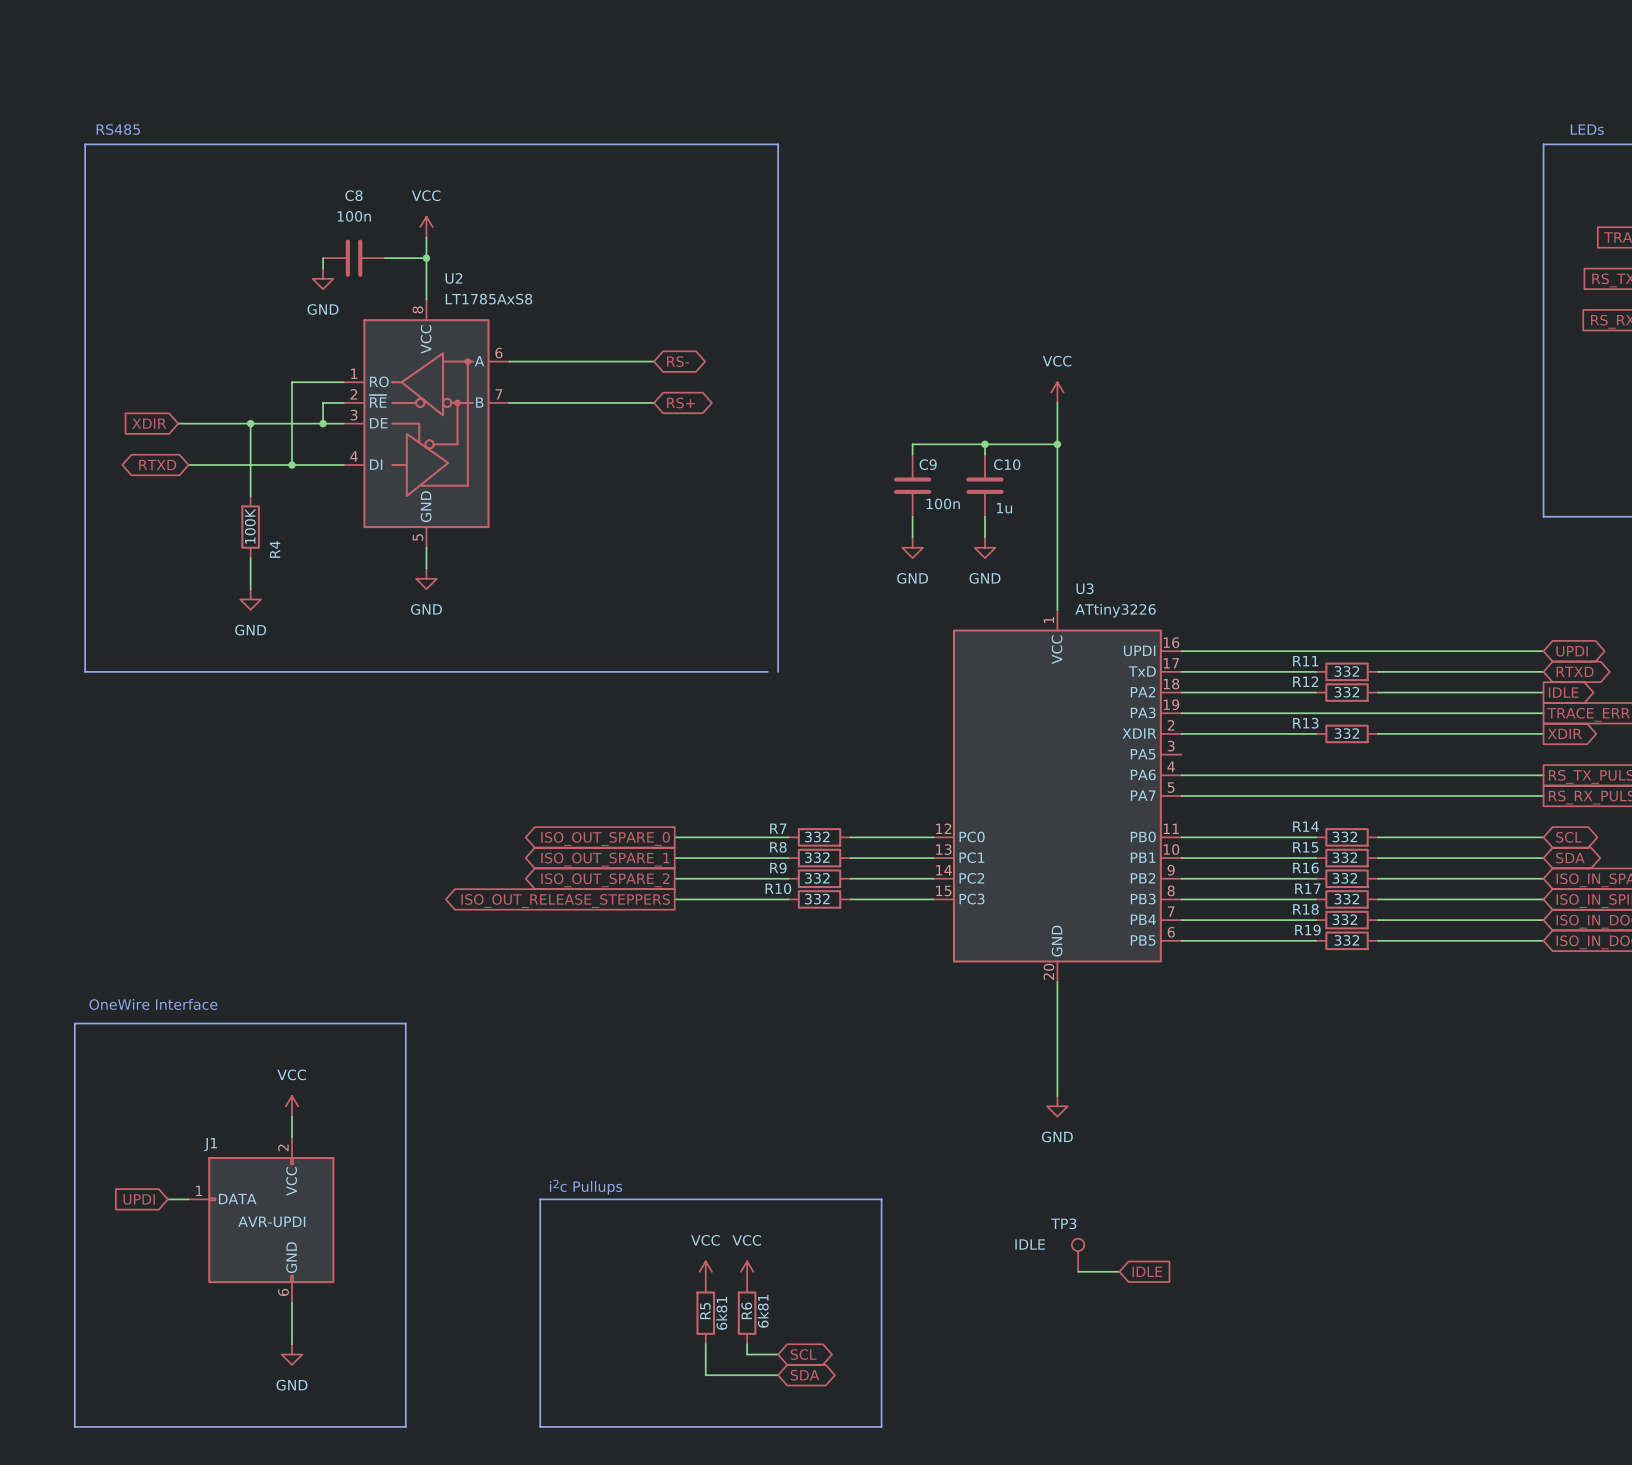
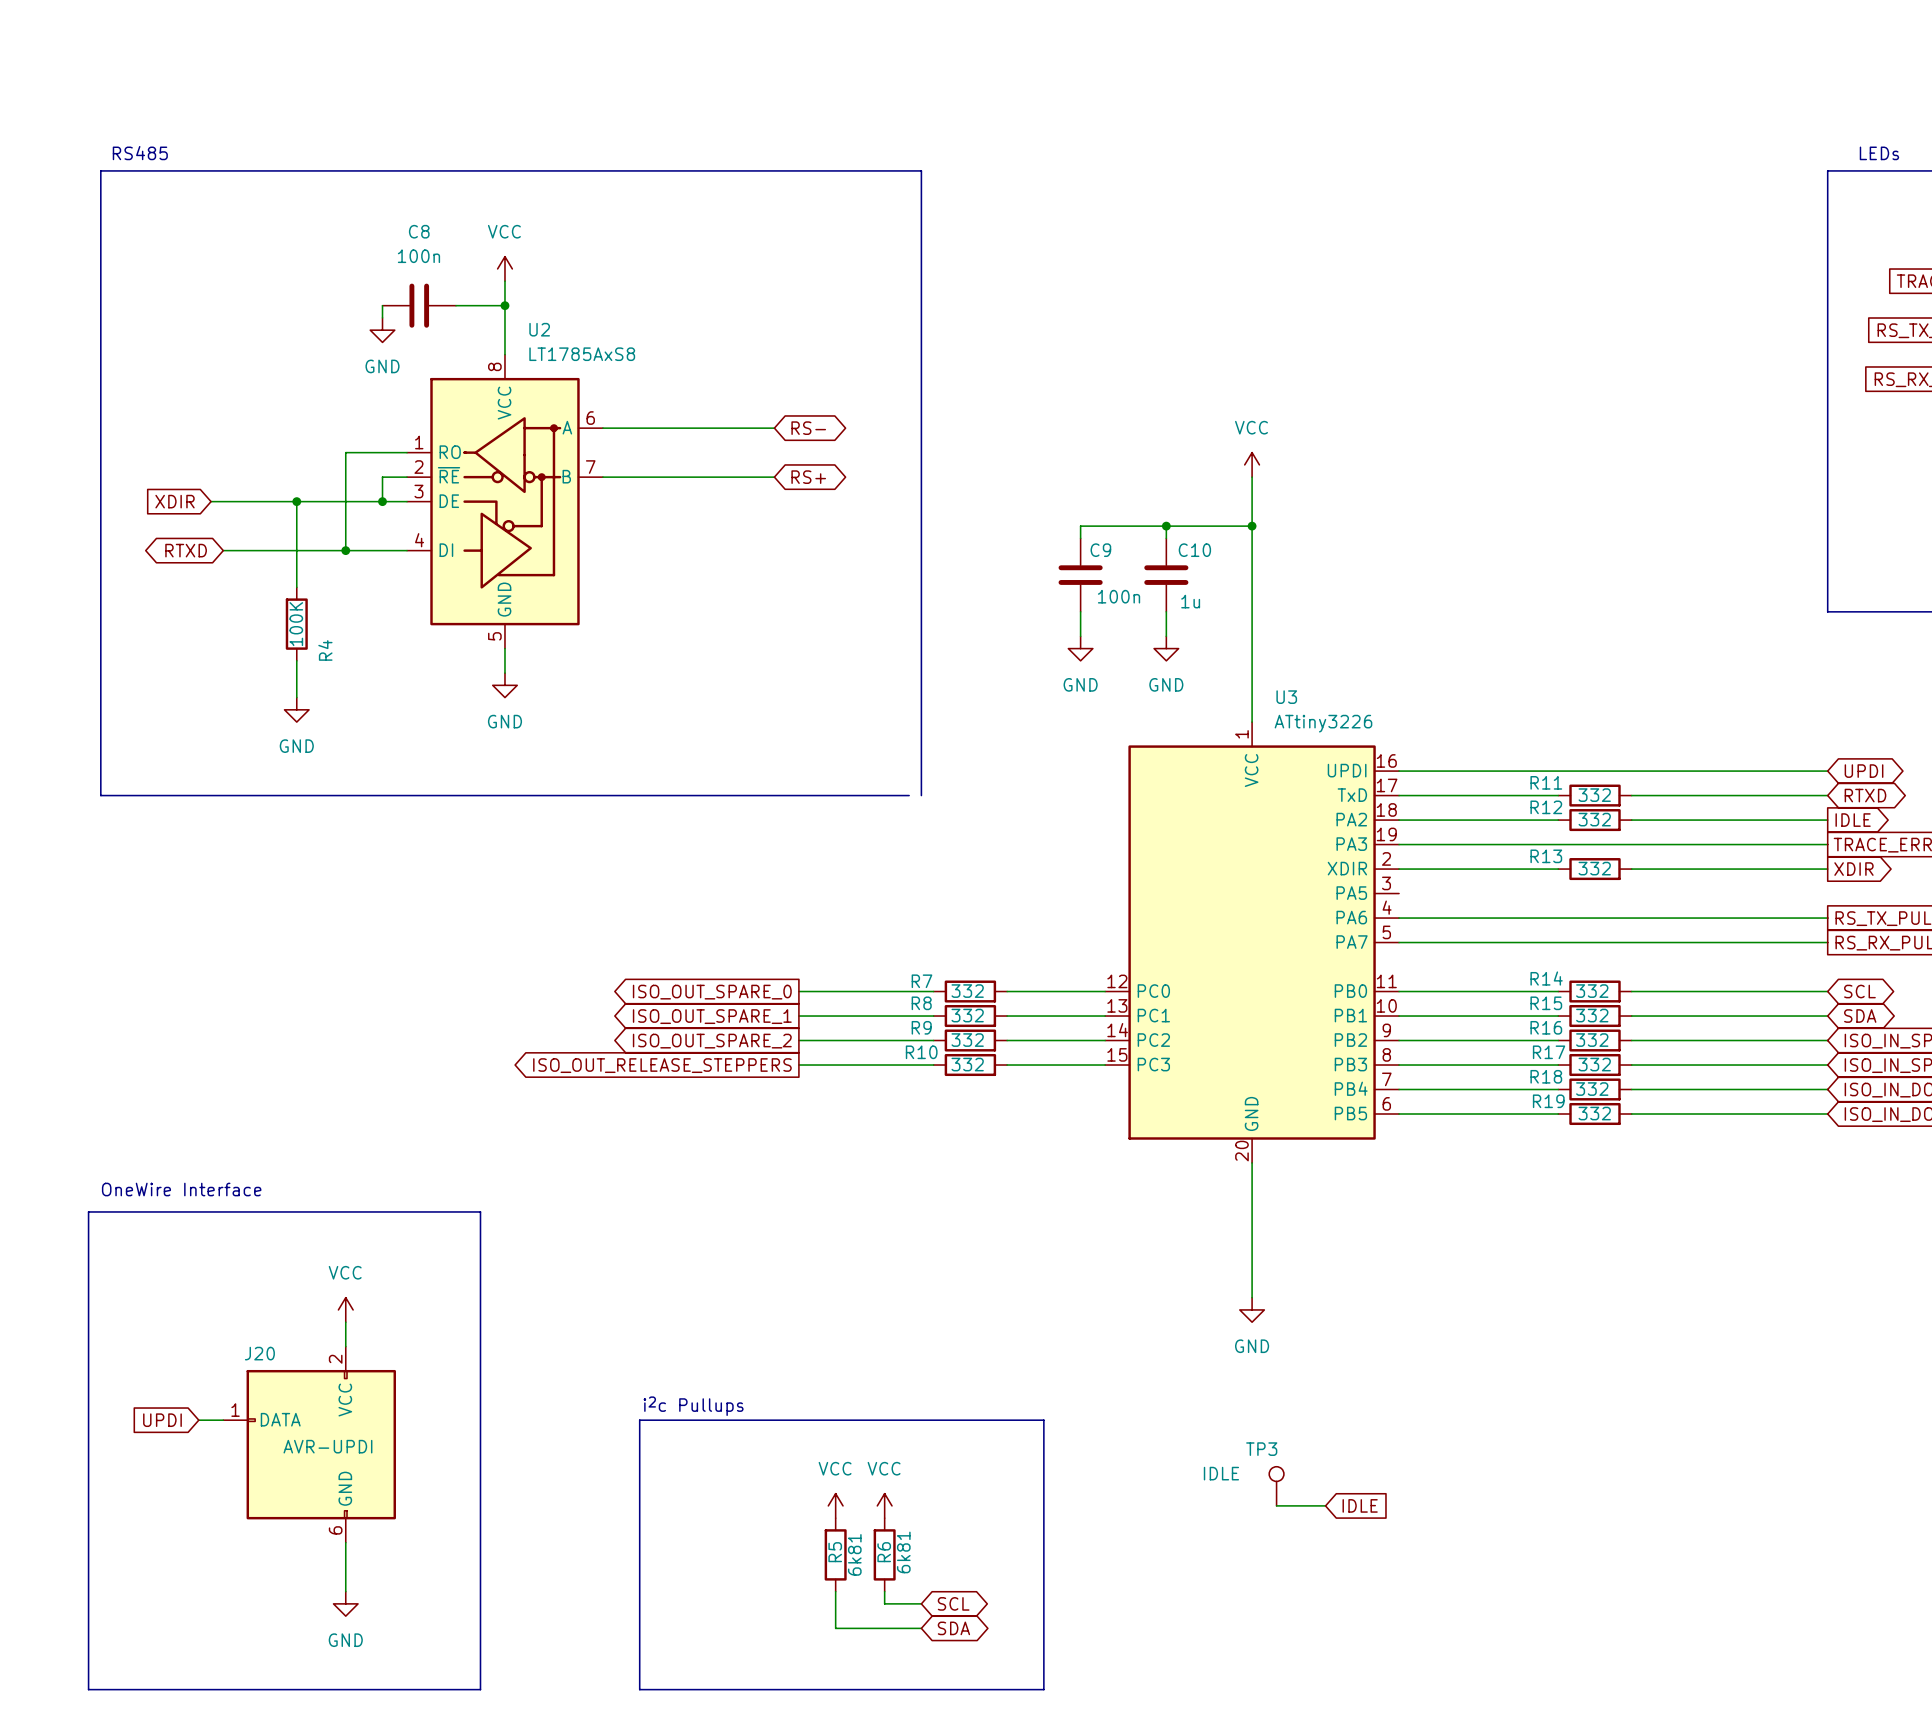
J1 name: J1 (210, 1144) -> J20 (259, 1353)

